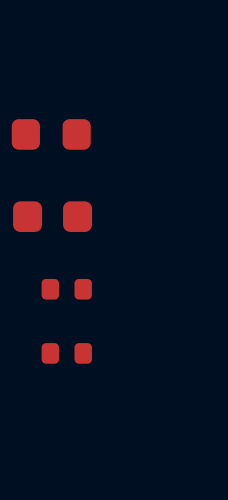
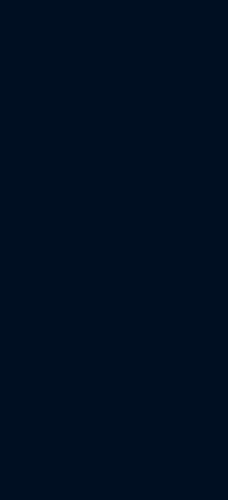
part: (51, 134) -> none
part: (52, 216) -> none
part: (66, 289) -> none
part: (66, 353) -> none

